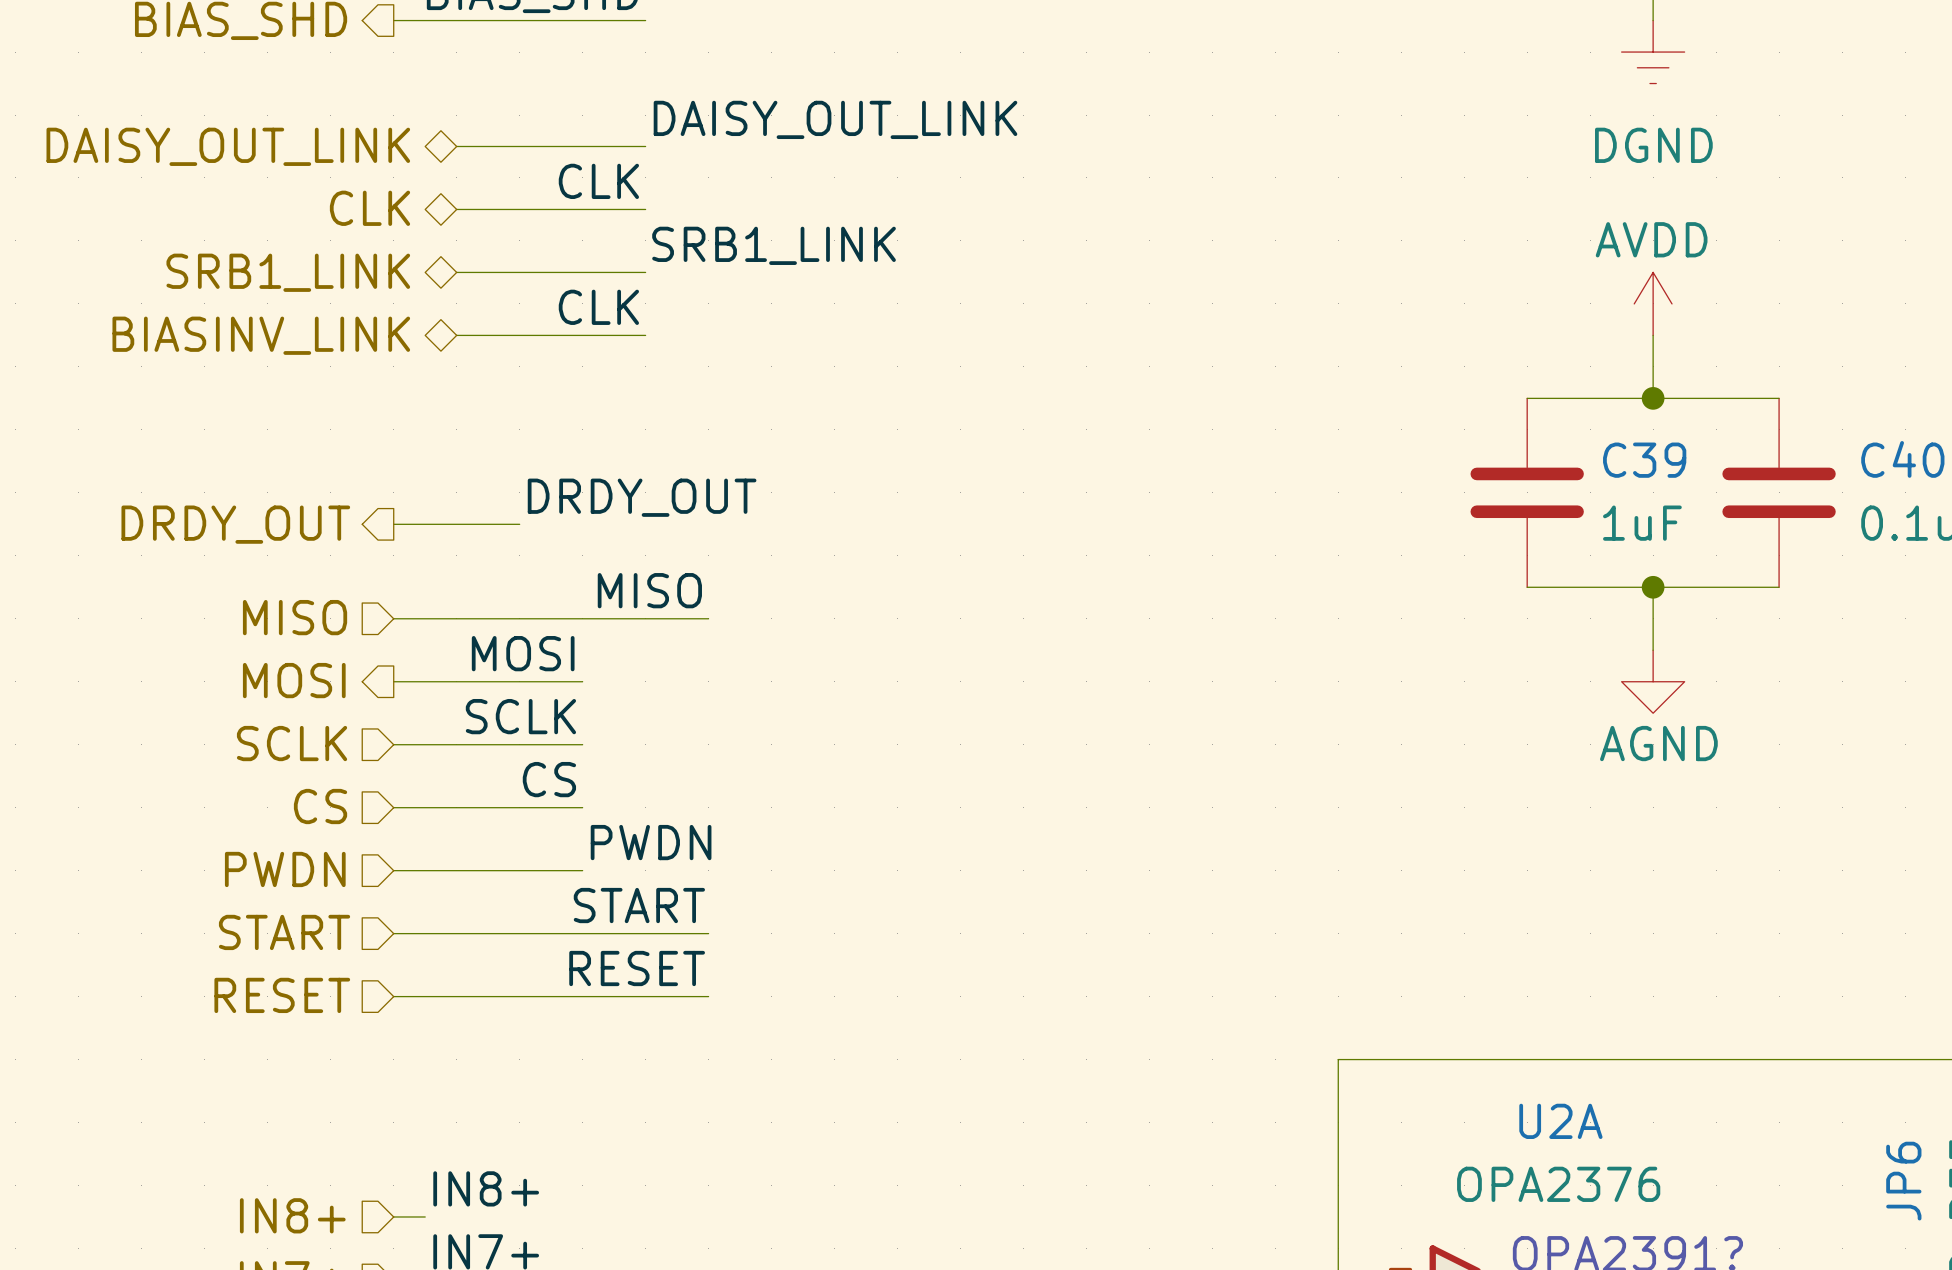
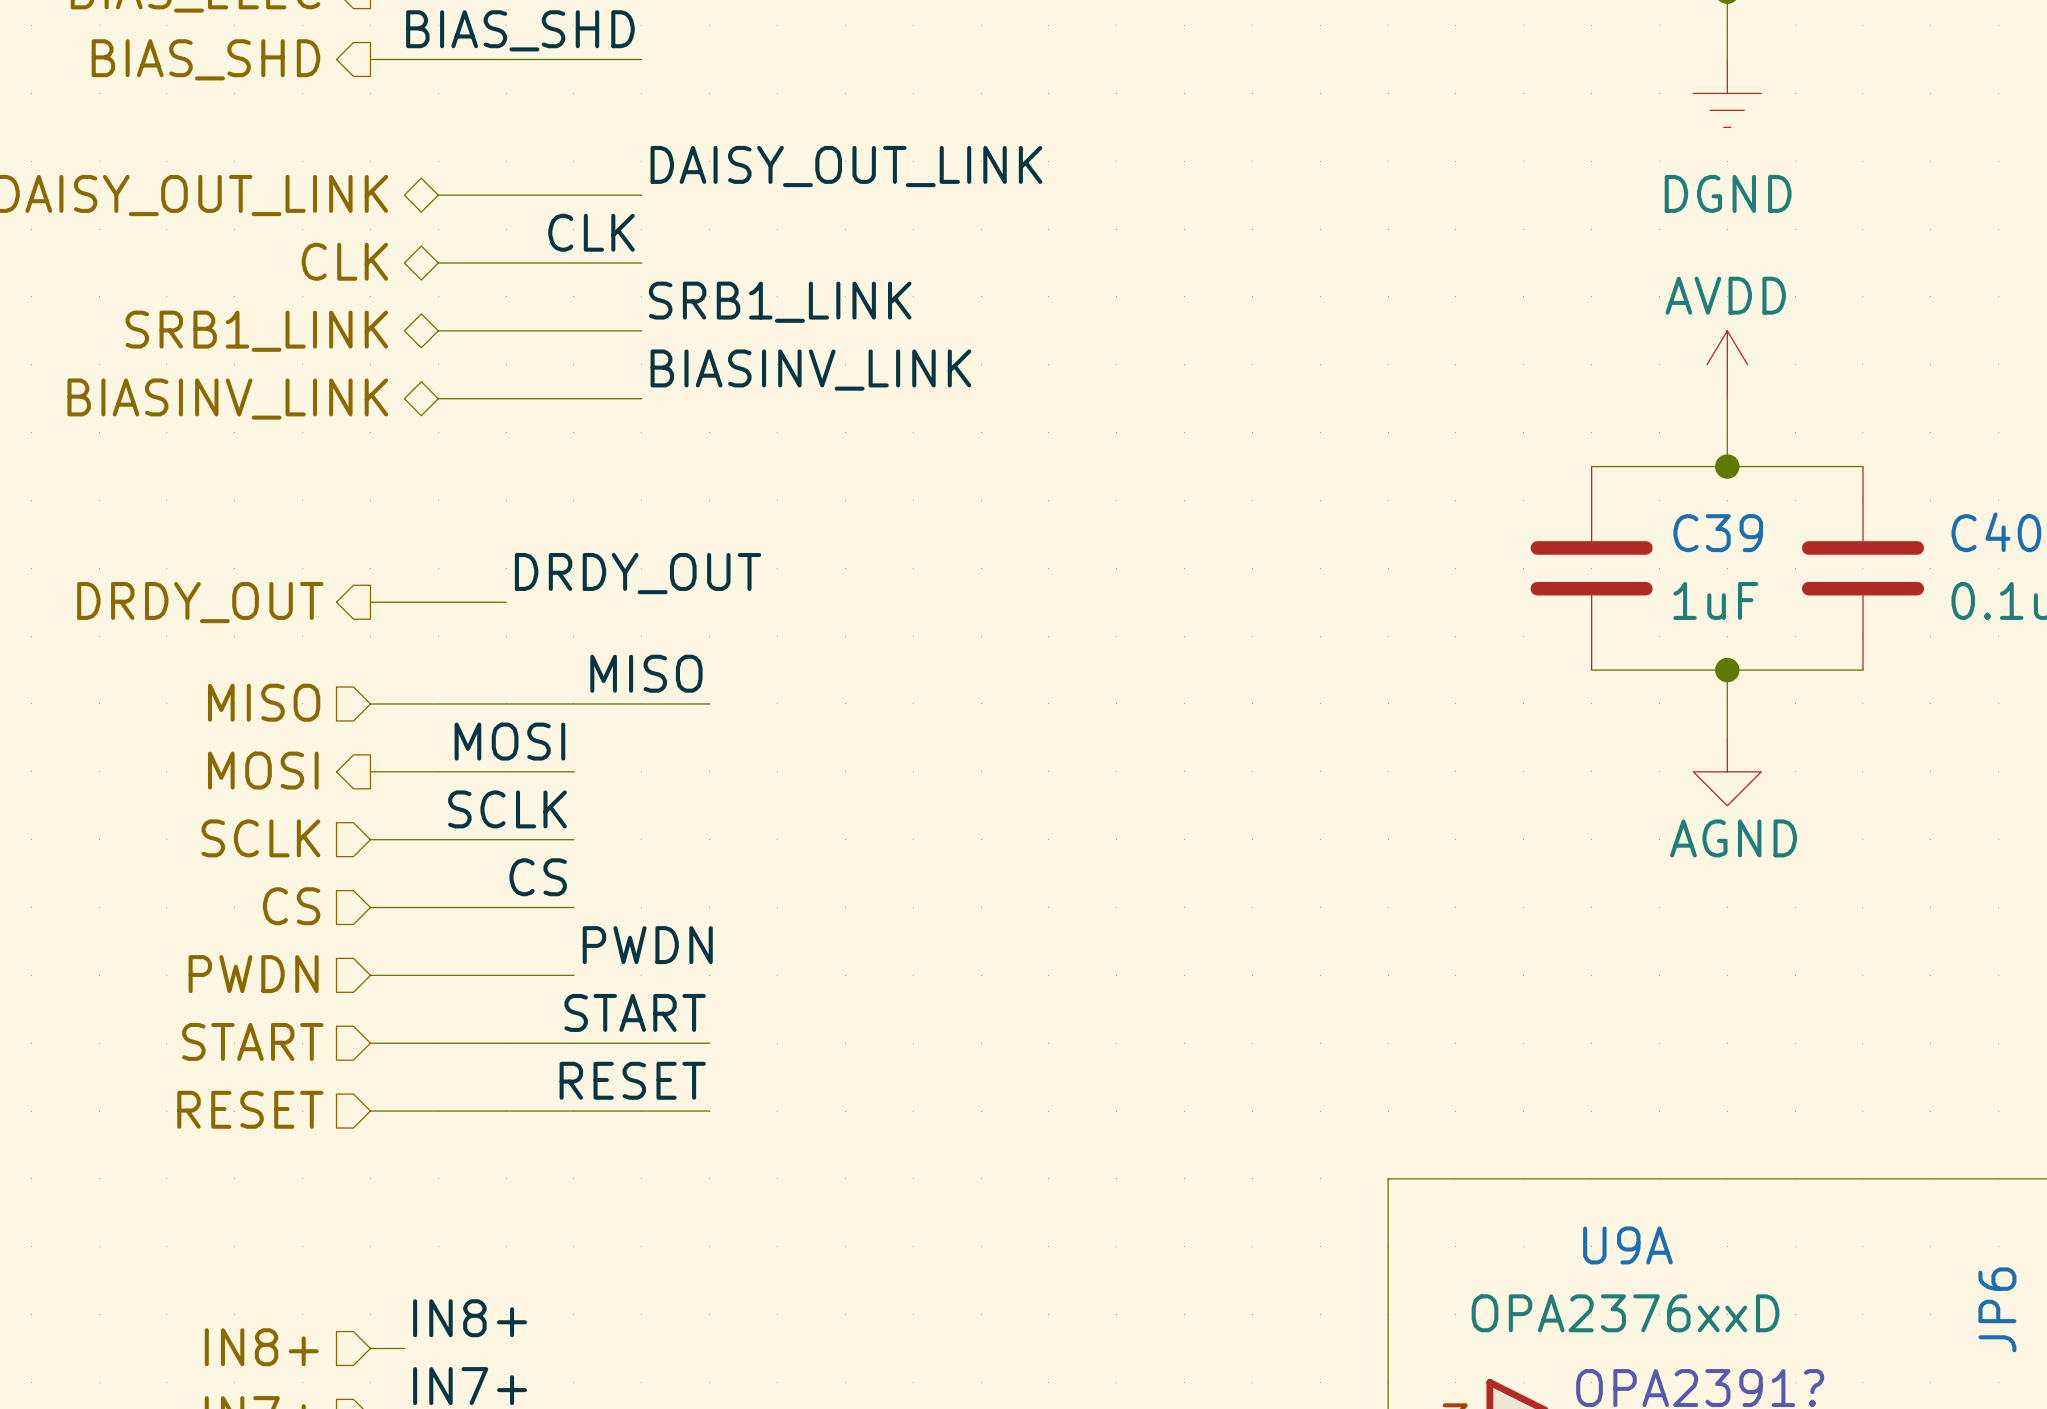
label: CLK (598, 307) -> BIASINV_LINK (810, 370)
U2A name: U2A (1560, 1121) -> U9A (1627, 1245)
U2A value: OPA2376 (1558, 1184) -> OPA2376xxD (1625, 1313)

